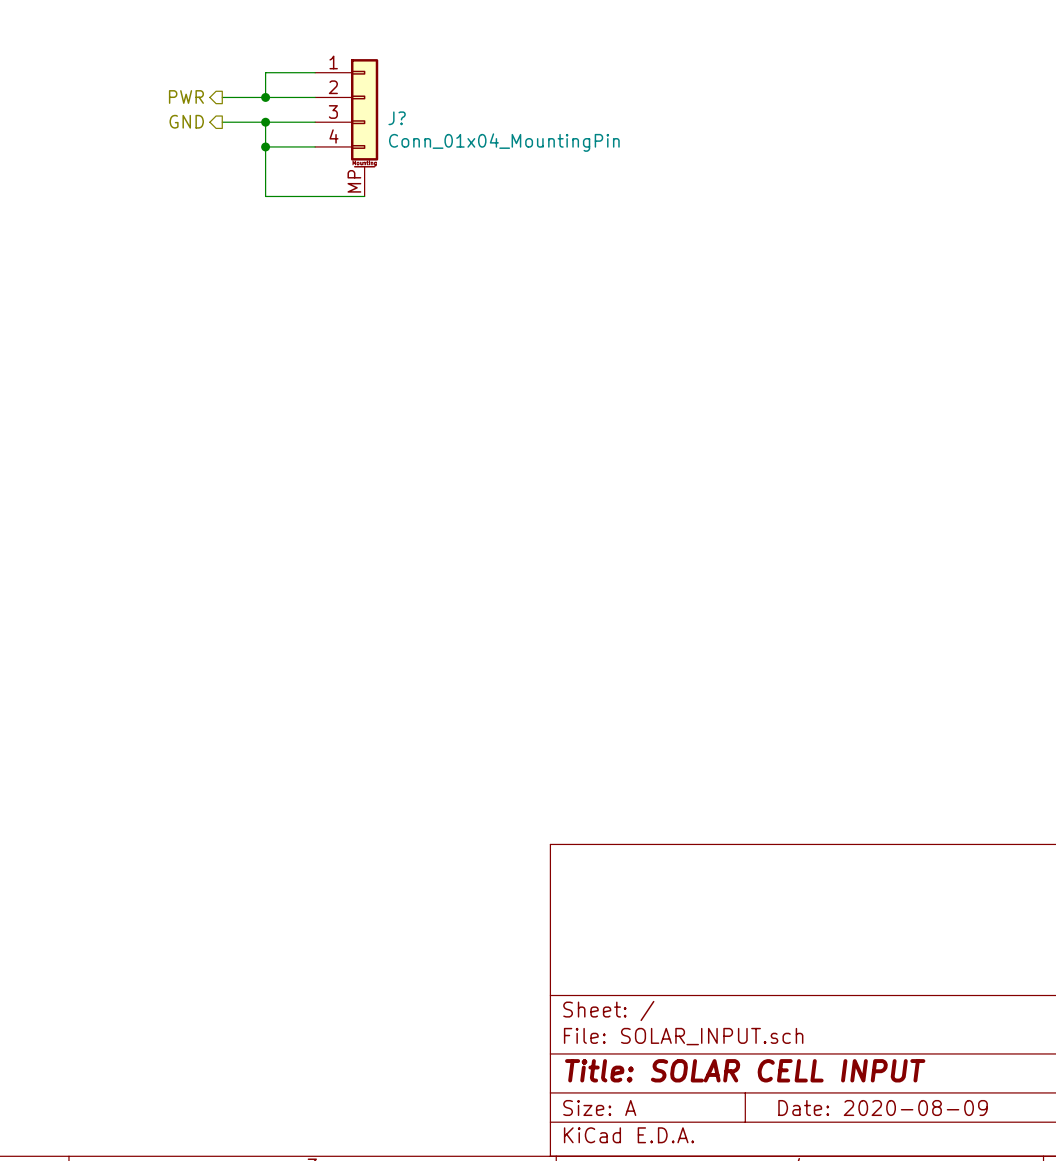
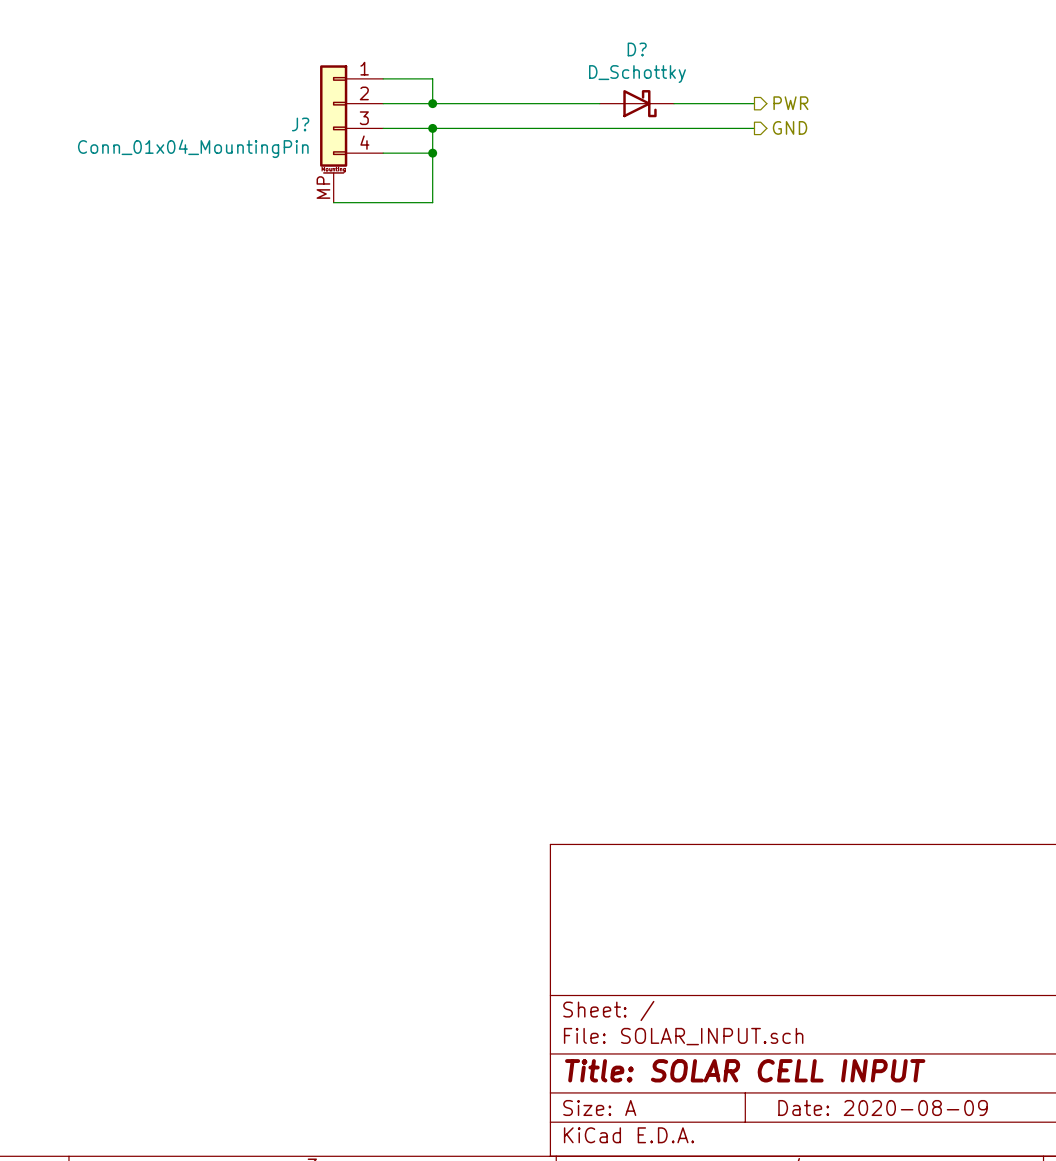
wire: (315, 72) (265, 72) (265, 97) -> none
wire: none -> (383, 78) (432, 78) (432, 103)
hierarchical label: PWR (186, 96) -> none
wire: (222, 97) (315, 97) -> none
junction: (265, 97) -> none
wire: none -> (383, 103) (599, 103)
junction: none -> (432, 103)
D?: none -> D_Schottky (636, 103)
wire: none -> (674, 103) (754, 103)
hierarchical label: none -> PWR (790, 103)
J? flip: as is (364, 113) -> left-right (333, 119)
hierarchical label: GND (186, 121) -> none
wire: (222, 122) (315, 122) -> none
wire: (265, 122) (265, 196) (364, 196) -> none
junction: (265, 122) -> none
hierarchical label: none -> GND (790, 127)
wire: none -> (383, 128) (754, 128)
wire: none -> (432, 128) (432, 202) (333, 202)
junction: none -> (432, 128)
wire: (265, 146) (315, 146) -> (383, 153) (432, 153)
junction: (265, 146) -> none
junction: none -> (432, 153)

